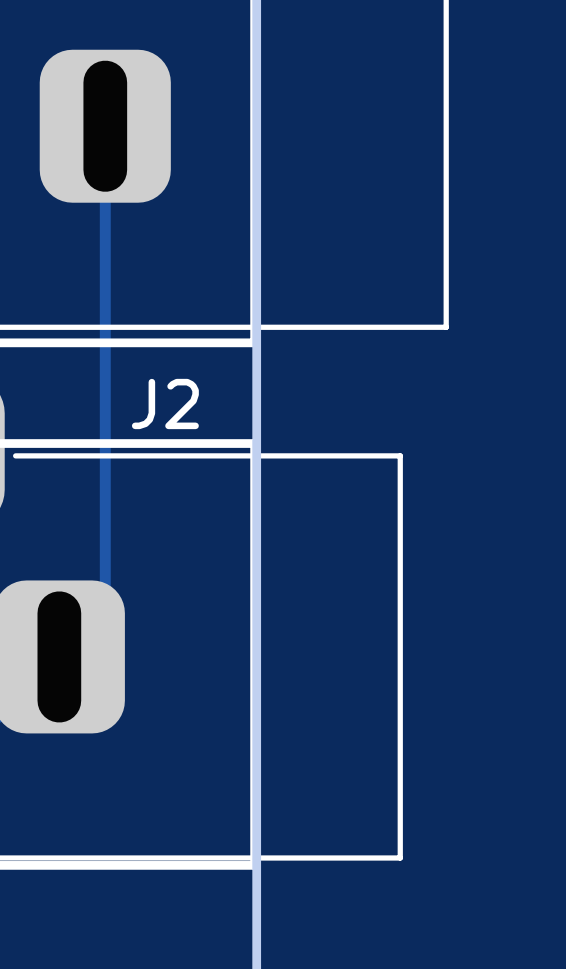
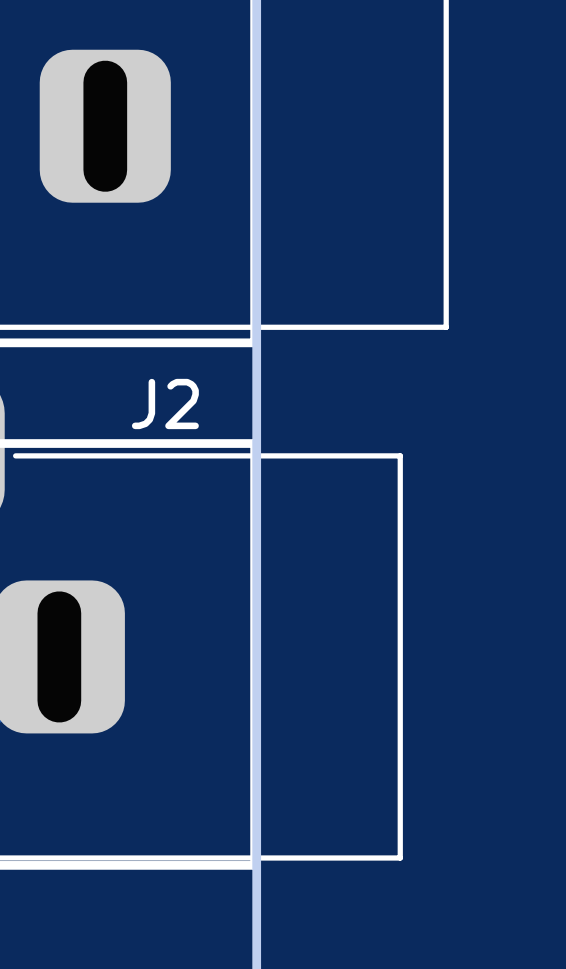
track: (105, 126) (105, 611) (59, 656) -> none

